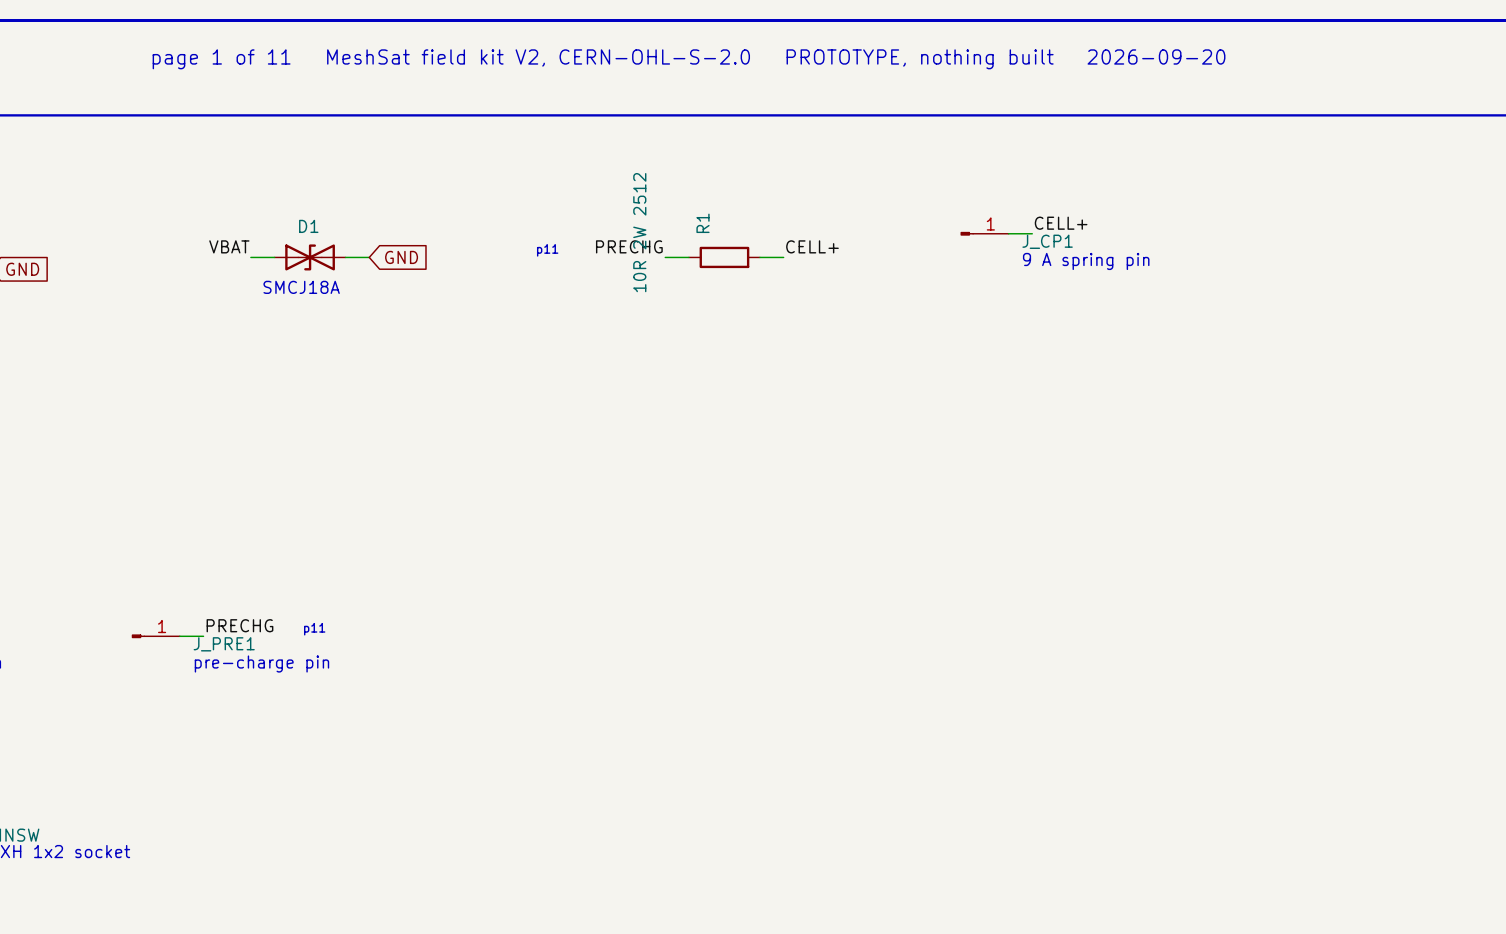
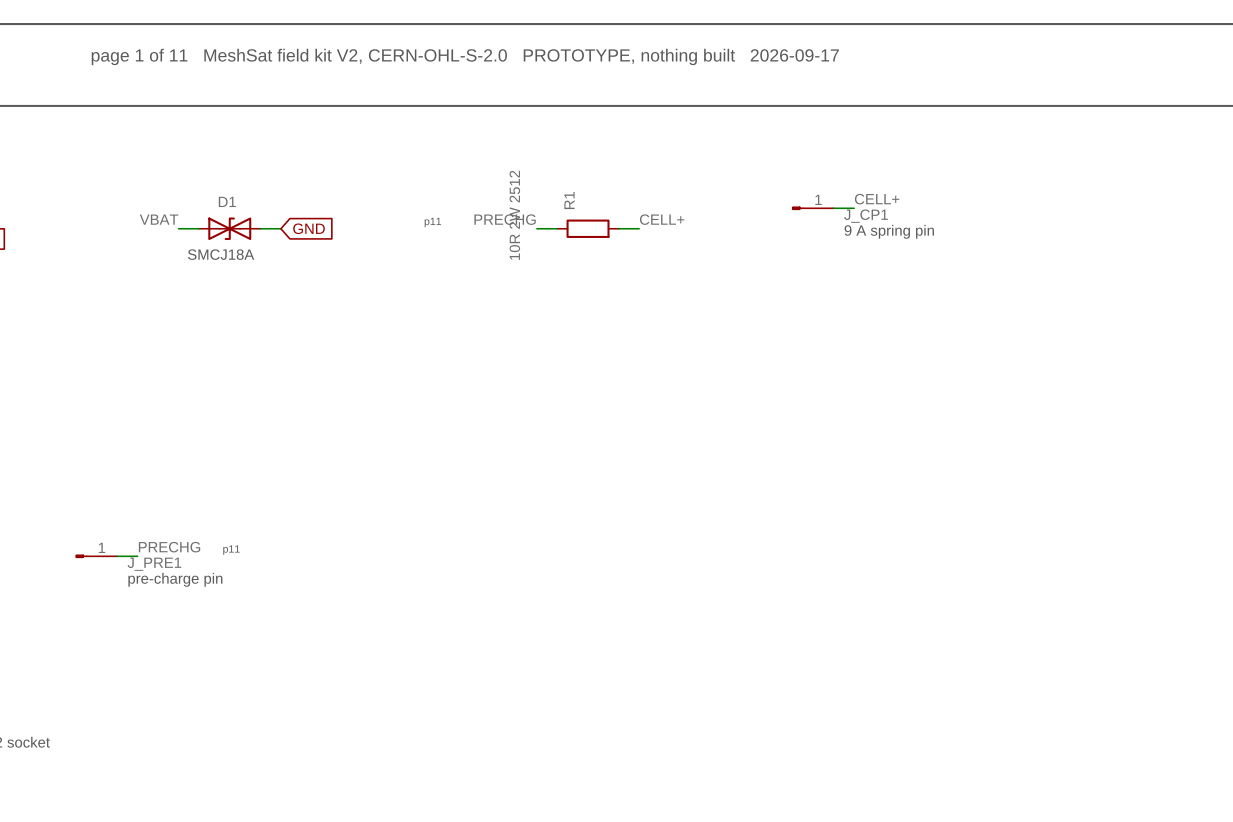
text: page 1 of 11 MeshSat field kit V2, CERN-OHL-S-2.0 PROTOTYPE, nothing built 2026-09-20 (689, 59) -> page 1 of 11 MeshSat field kit V2, CERN-OHL-S-2.0 PROTOTYPE, nothing built 2026-09-17 (465, 56)

